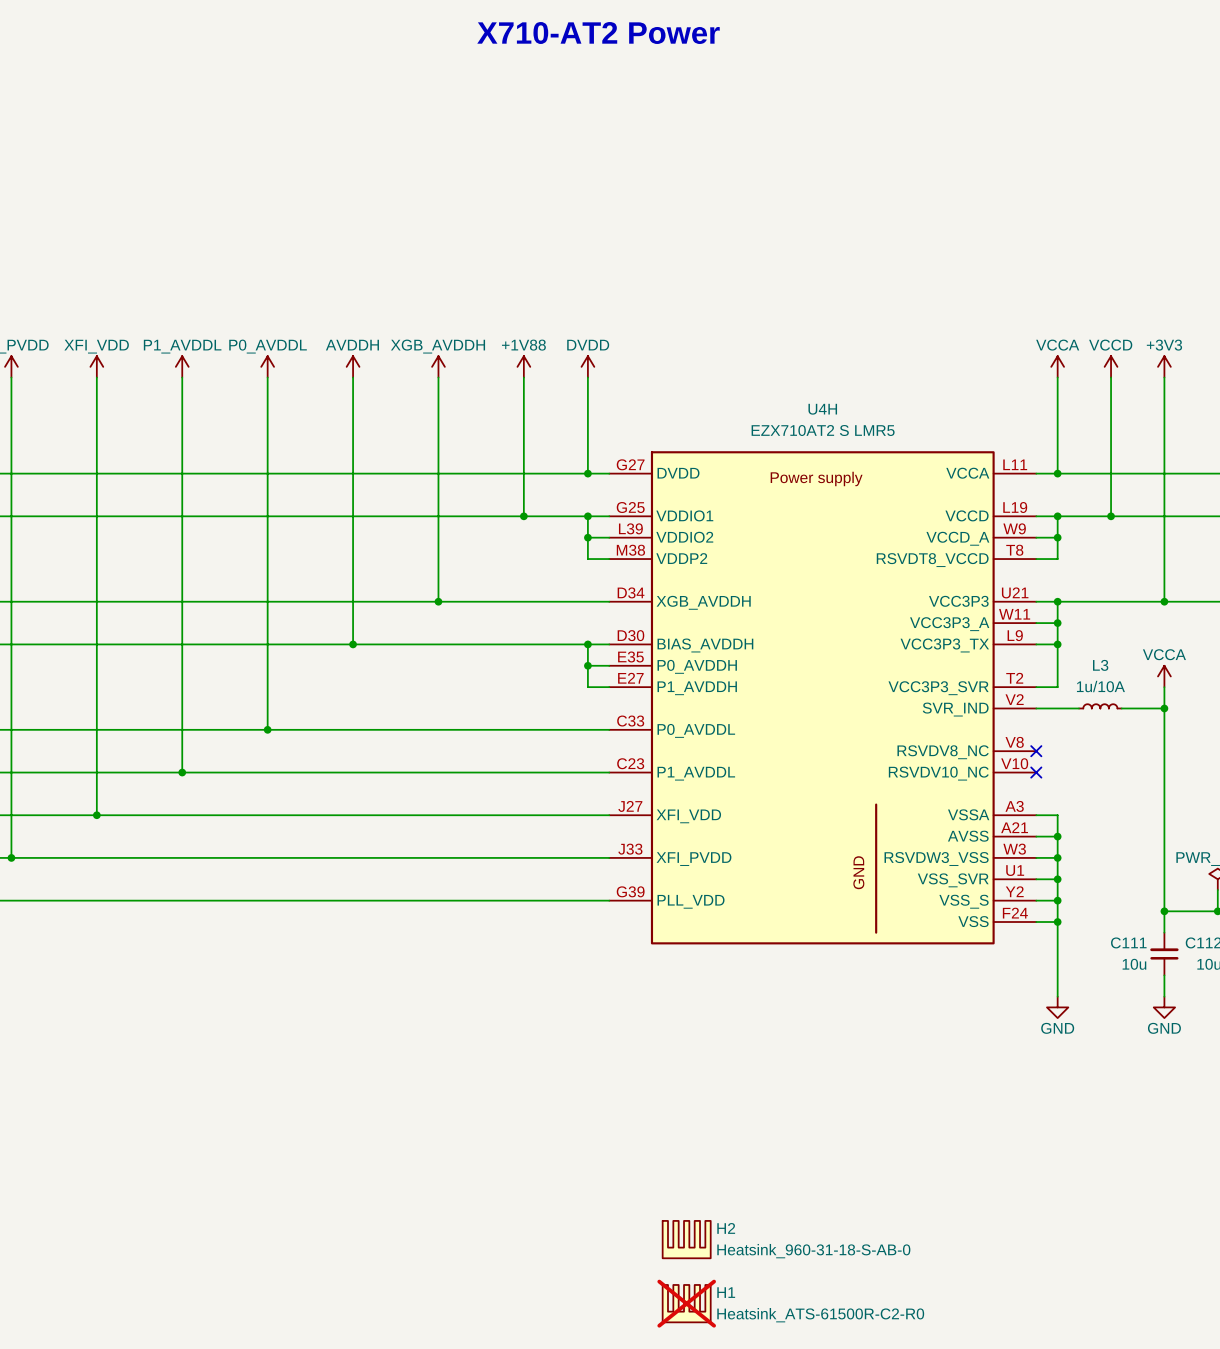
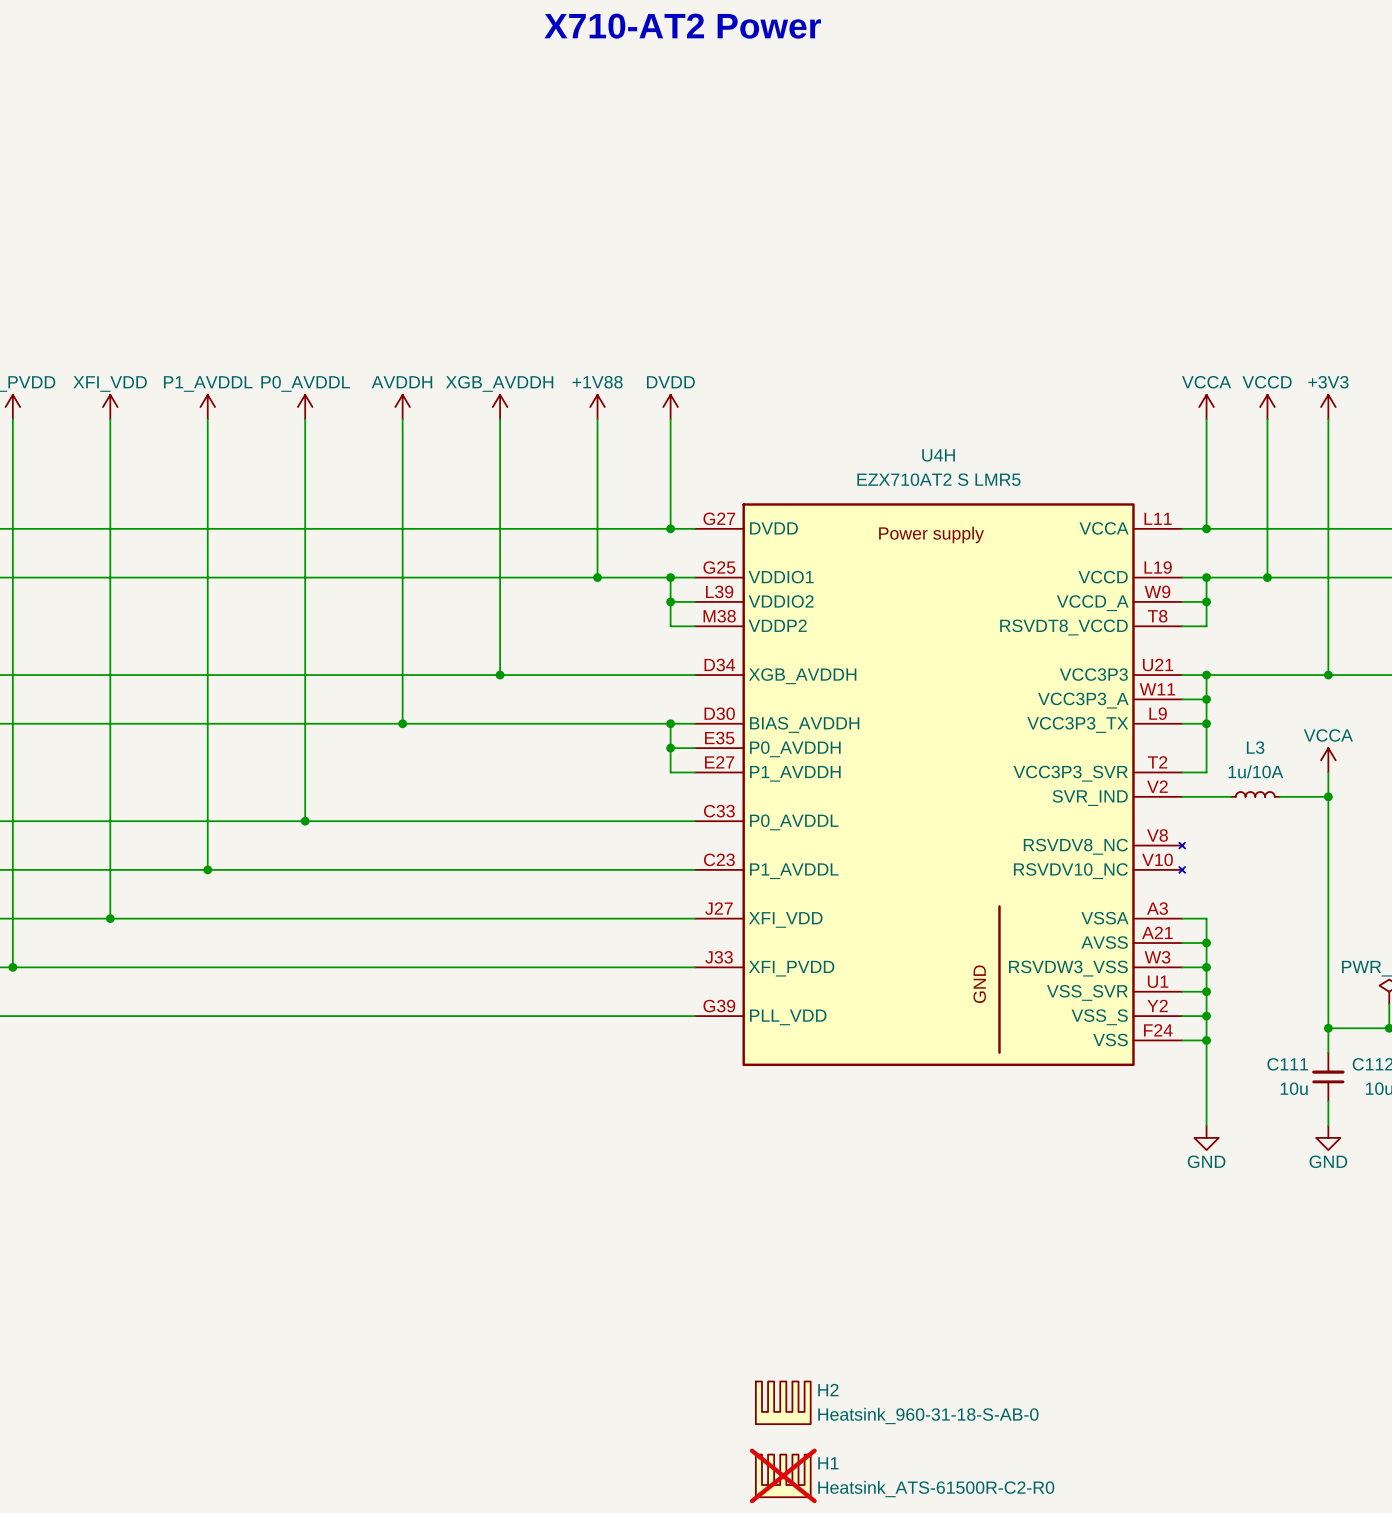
U4H symbol: [609, 451, 1037, 945] -> [694, 503, 1186, 1067]
no-connect mark: (1036, 751) -> none
no-connect mark: (1036, 772) -> none

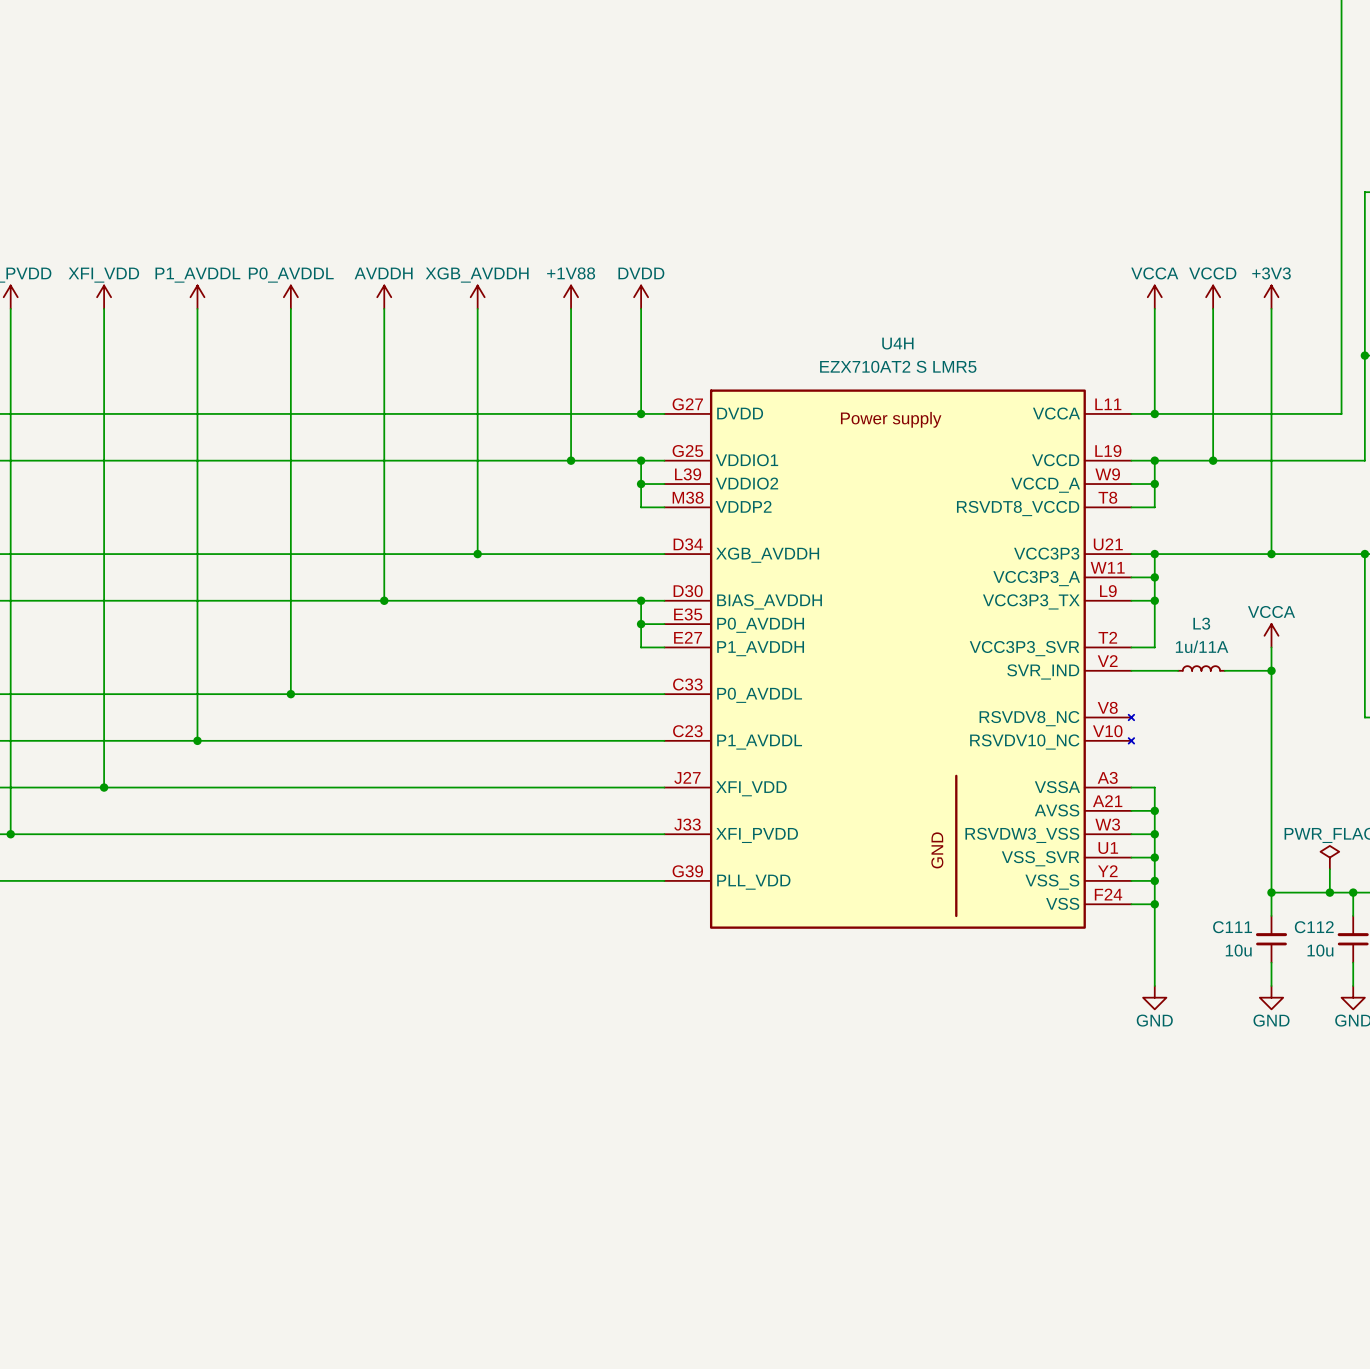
L3 text: 1u/10A (1255, 771) -> 1u/11A (1202, 646)
H2: Heatsink_960-31-18-S-AB-0 (783, 1402) -> none
H1: Heatsink_ATS-61500R-C2-R0 (783, 1475) -> none

